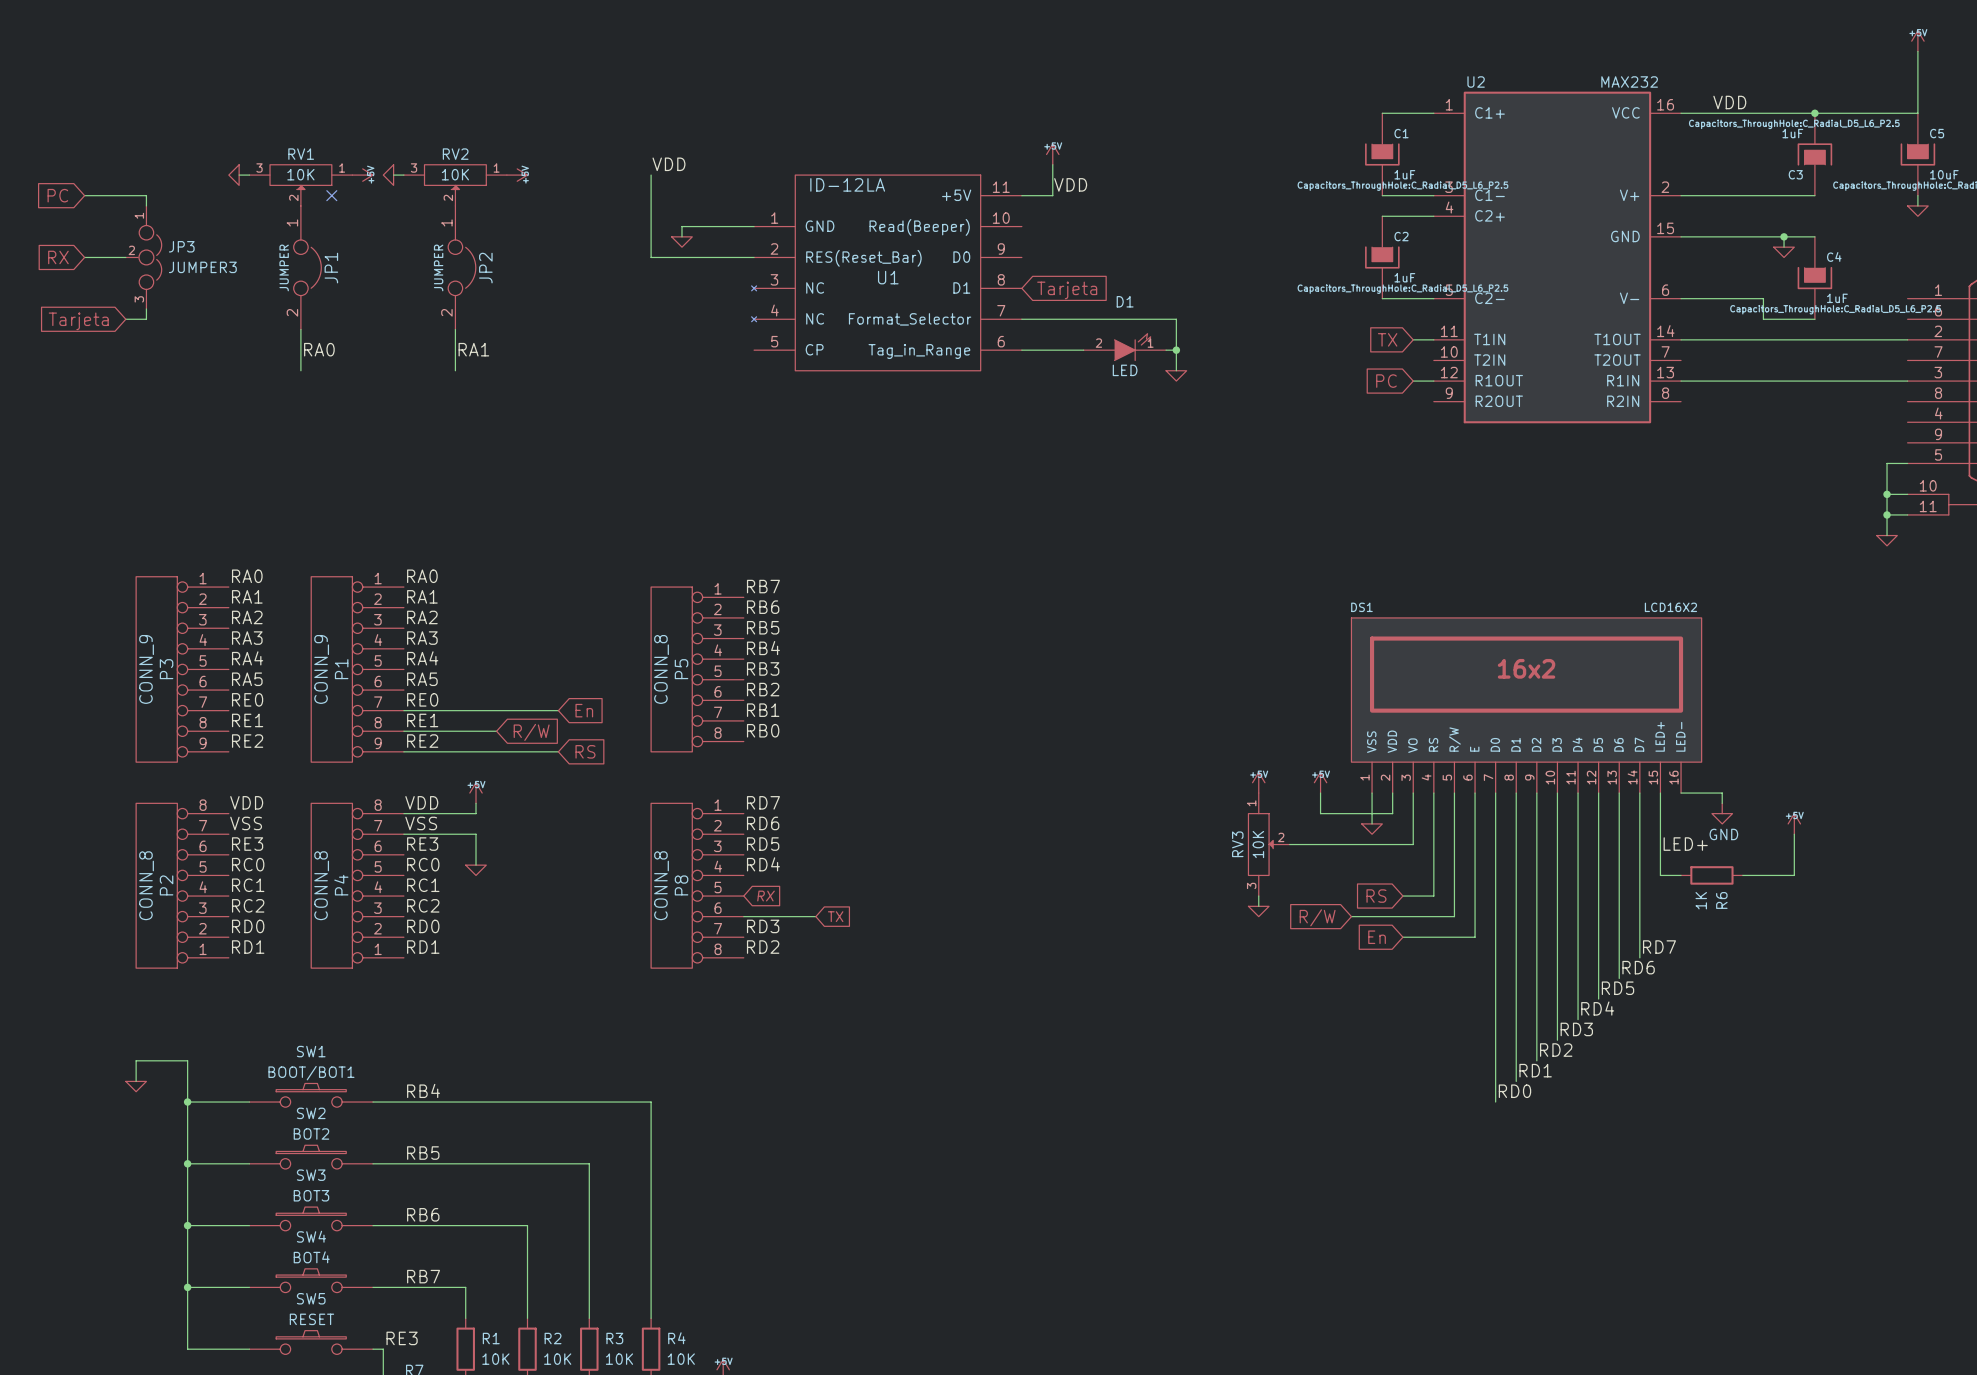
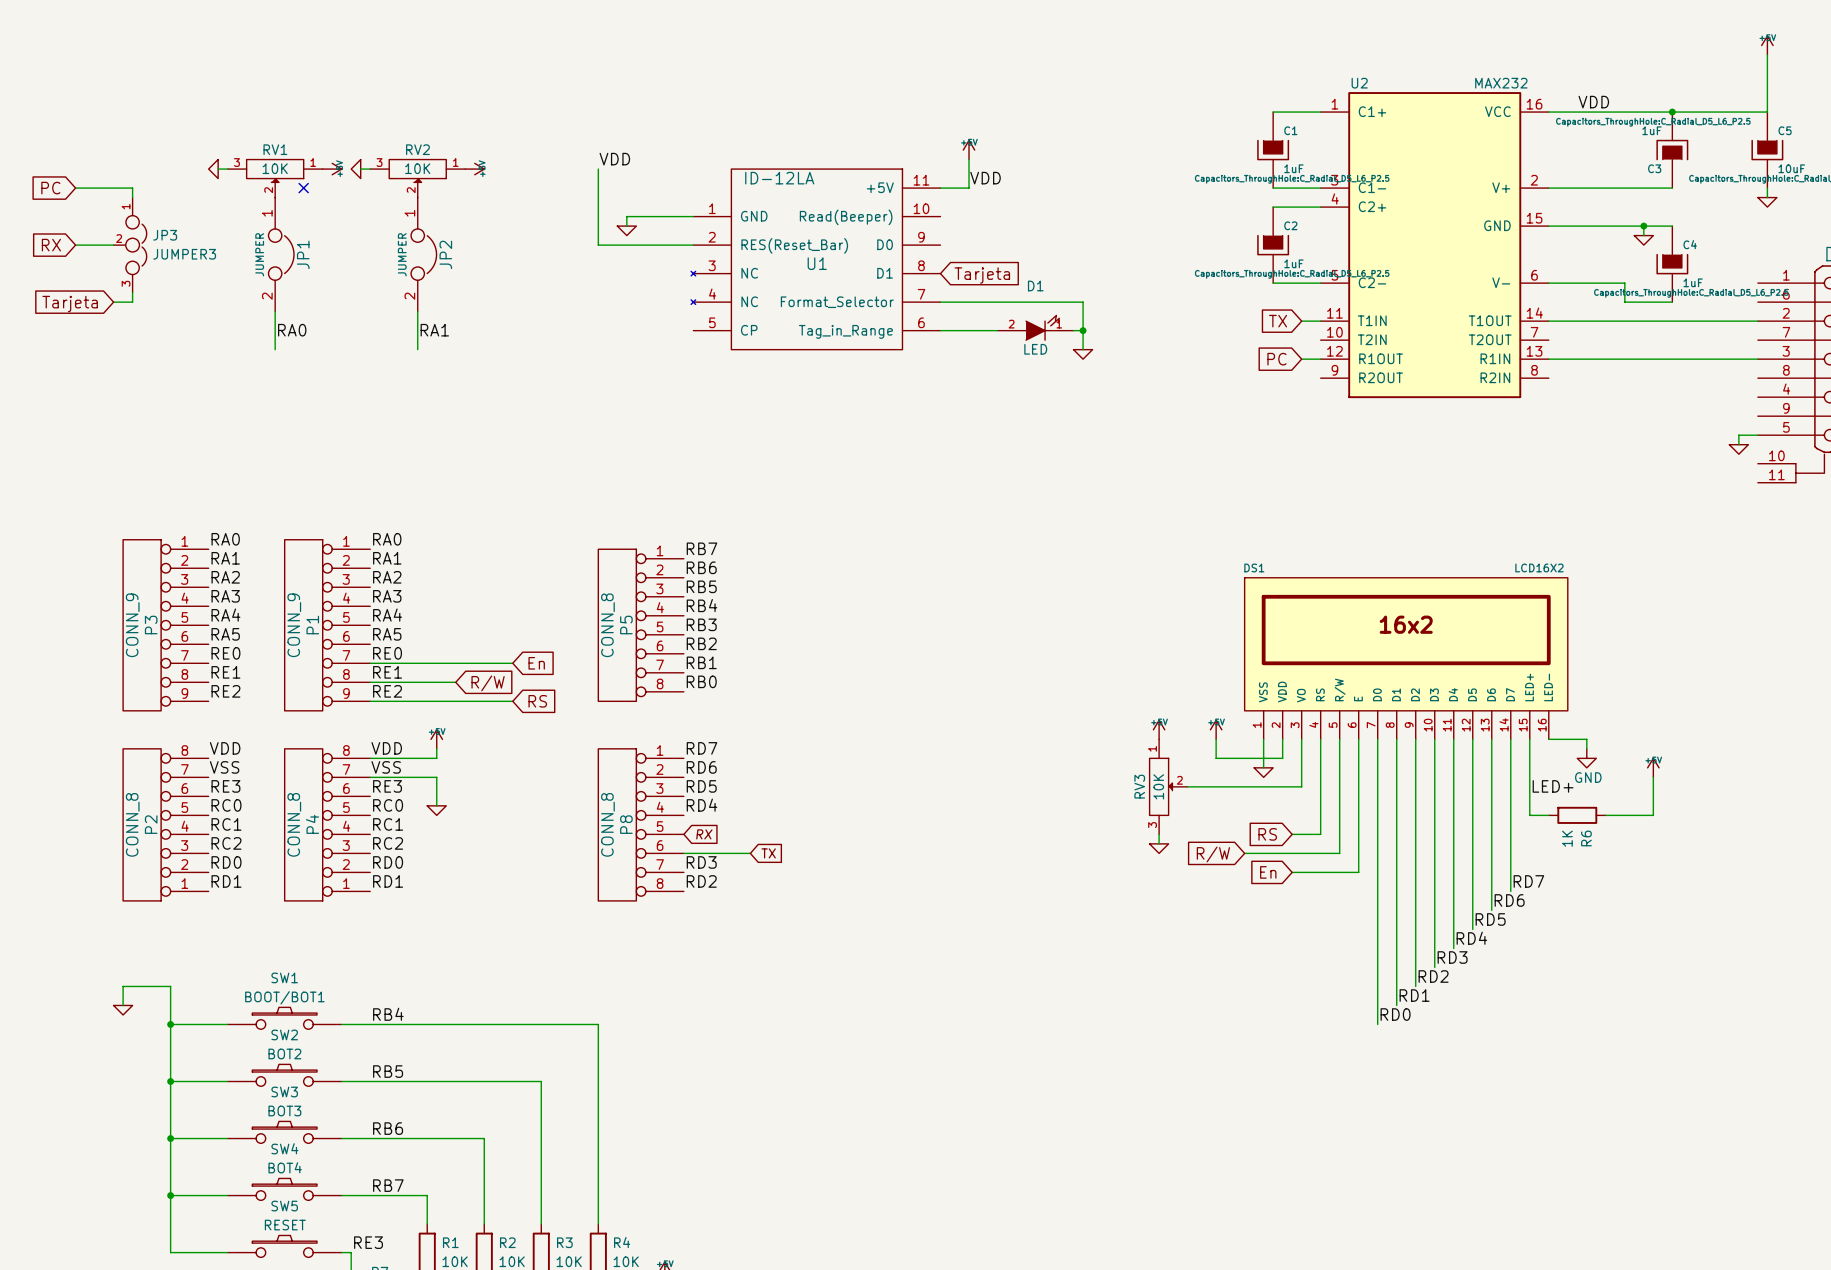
wire: (1887, 473) (1887, 535) -> none
wire: (1887, 494) (1907, 494) -> none
junction: (1887, 494) -> none
wire: (1887, 514) (1907, 514) -> none
junction: (1887, 514) -> none
power symbol position: (1887, 540) -> (1738, 449)

